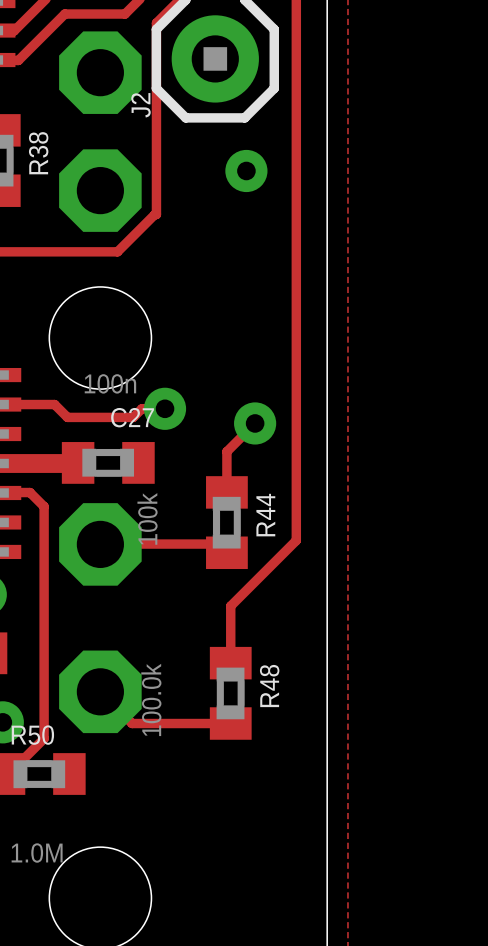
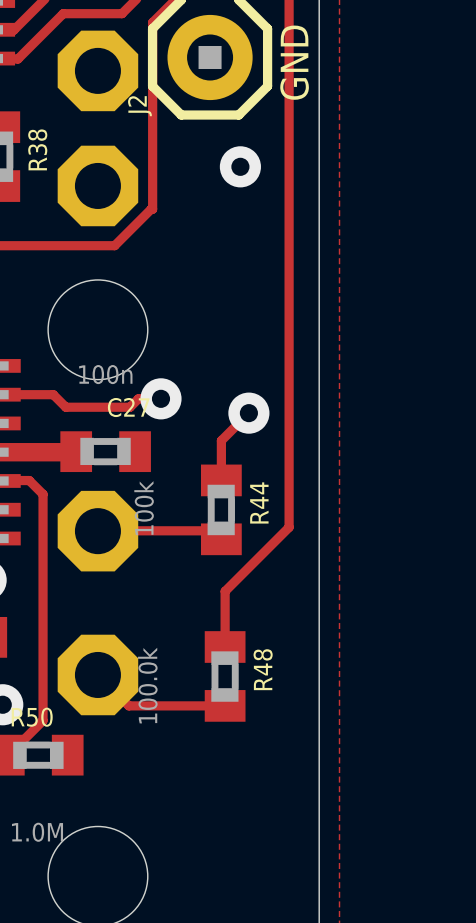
text: none -> GND (294, 62)

